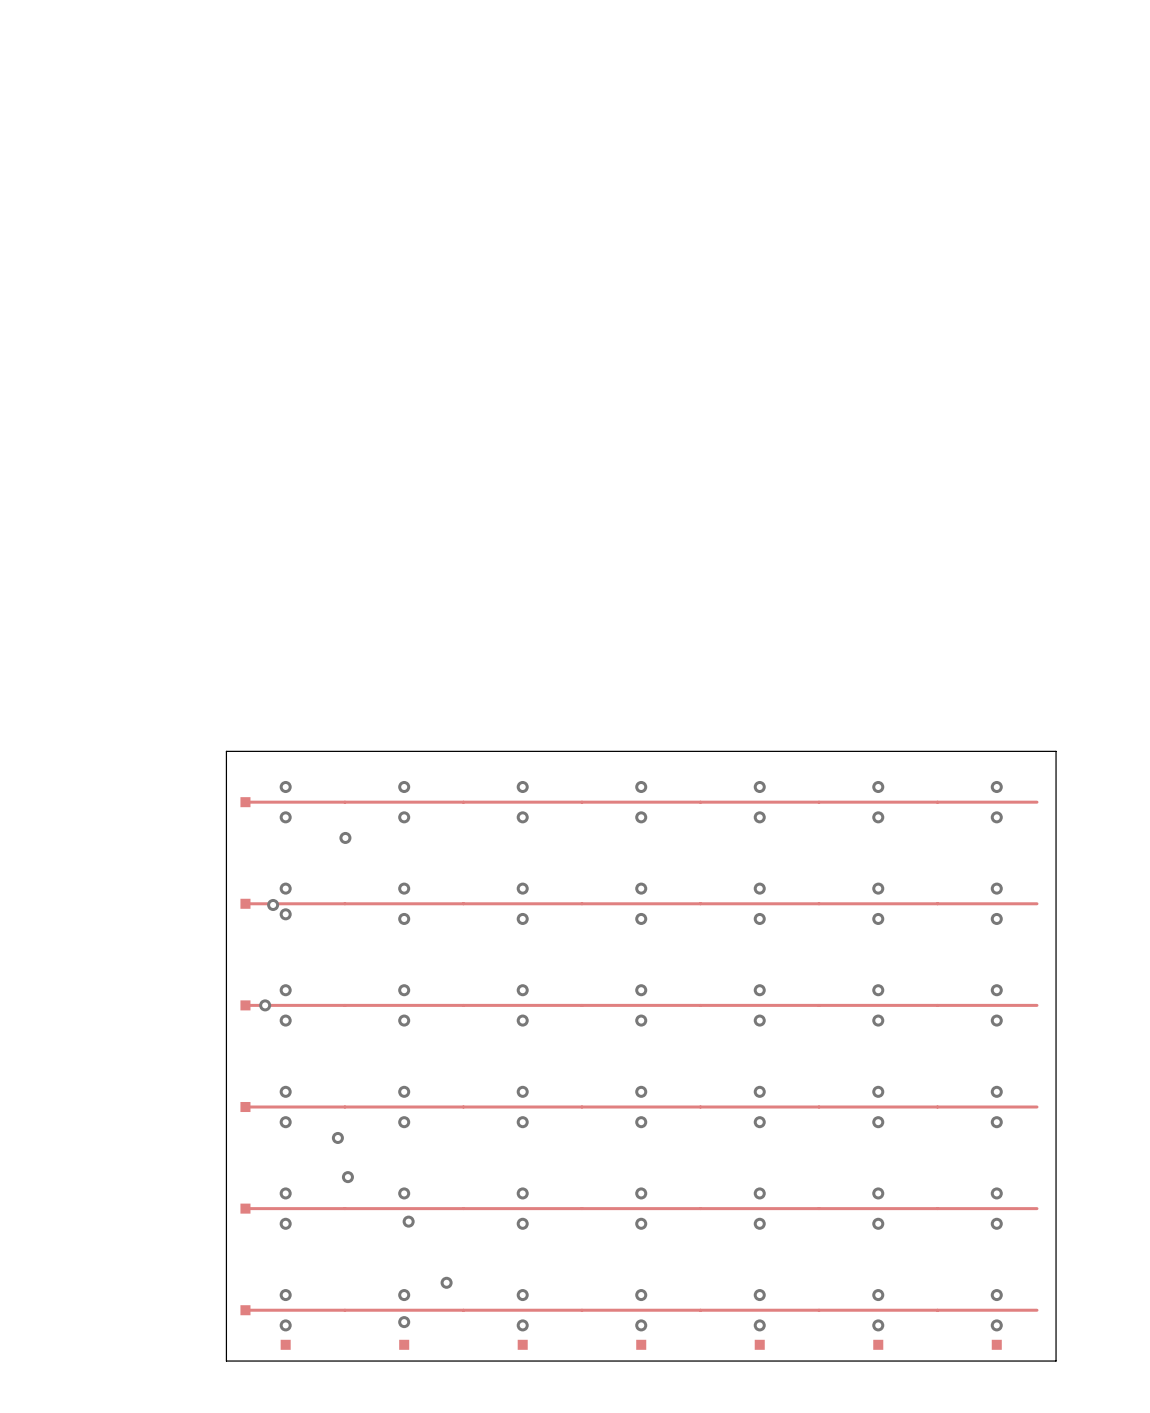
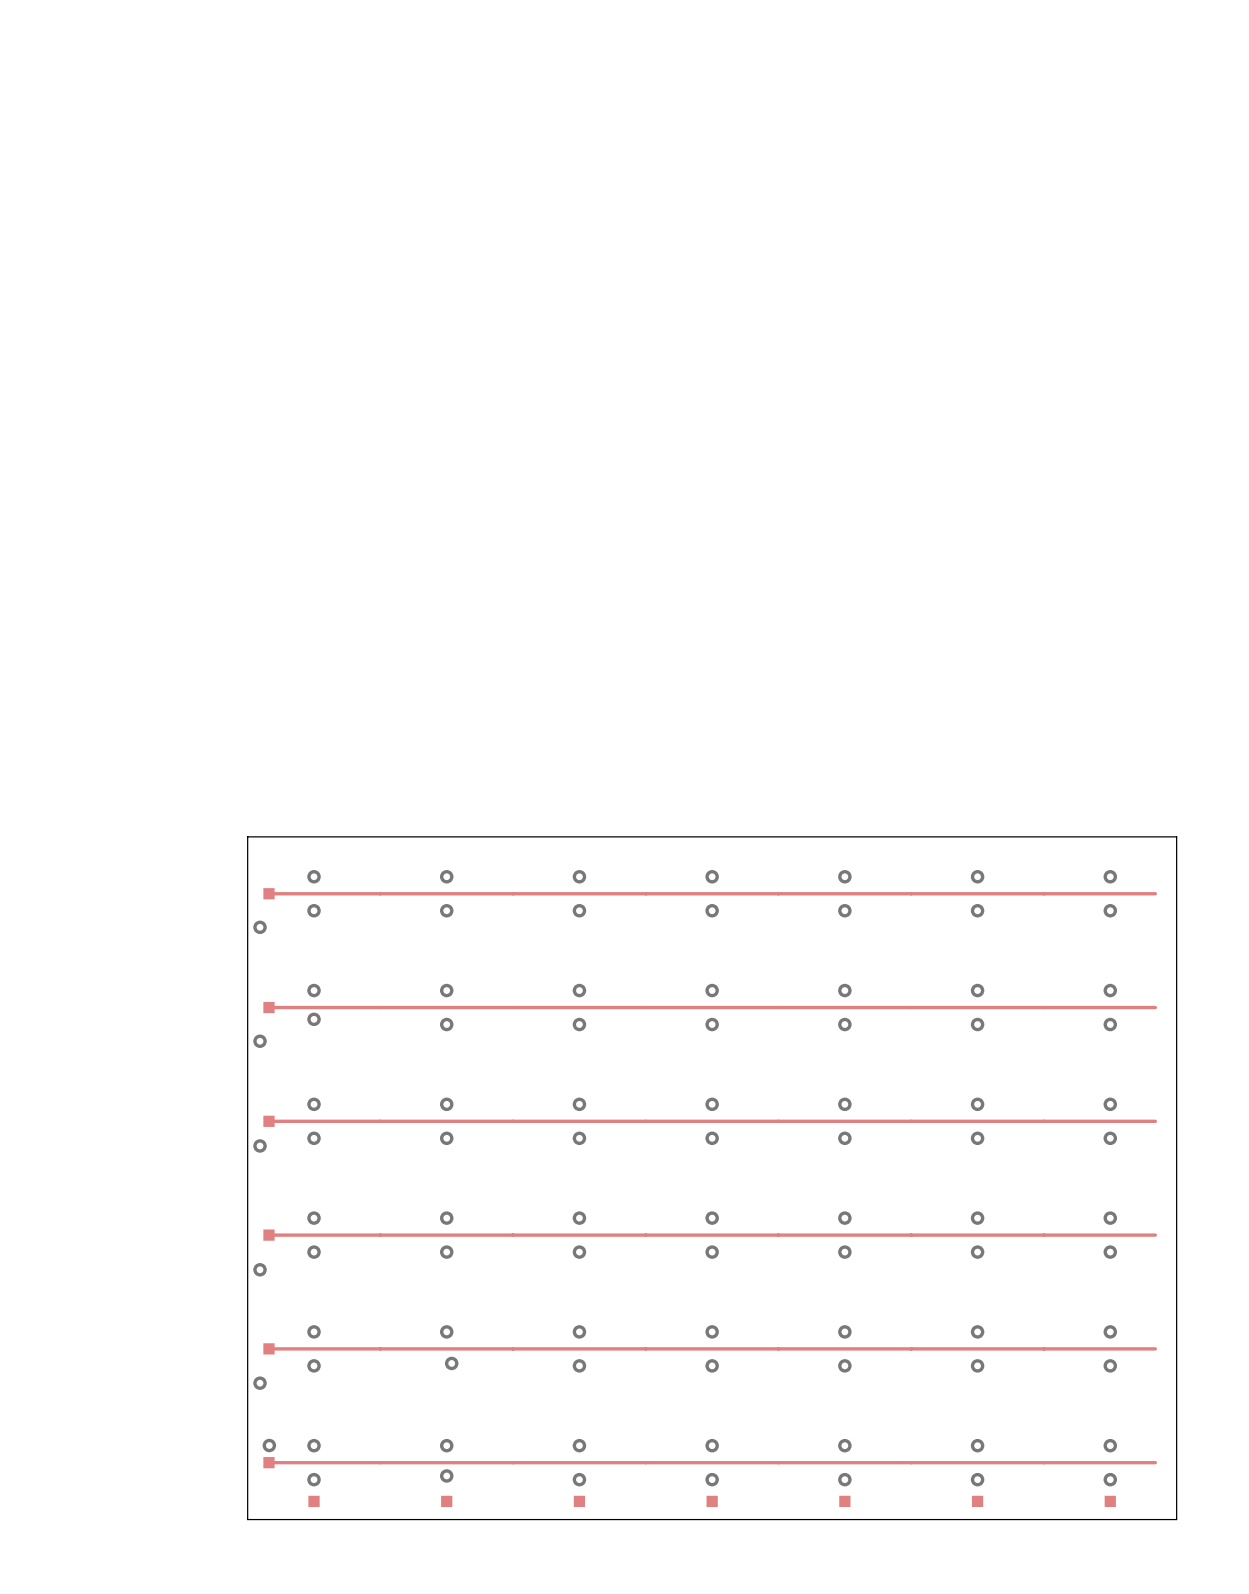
via: none -> (260, 927)
via: (345, 837) -> none
via: (273, 904) -> none
via: none -> (260, 1041)
via position: (265, 1005) -> (260, 1145)
via: none -> (260, 1269)
via: (337, 1137) -> none
via: (347, 1177) -> none
via: none -> (260, 1383)
via: (446, 1282) -> none
via: none -> (269, 1445)

